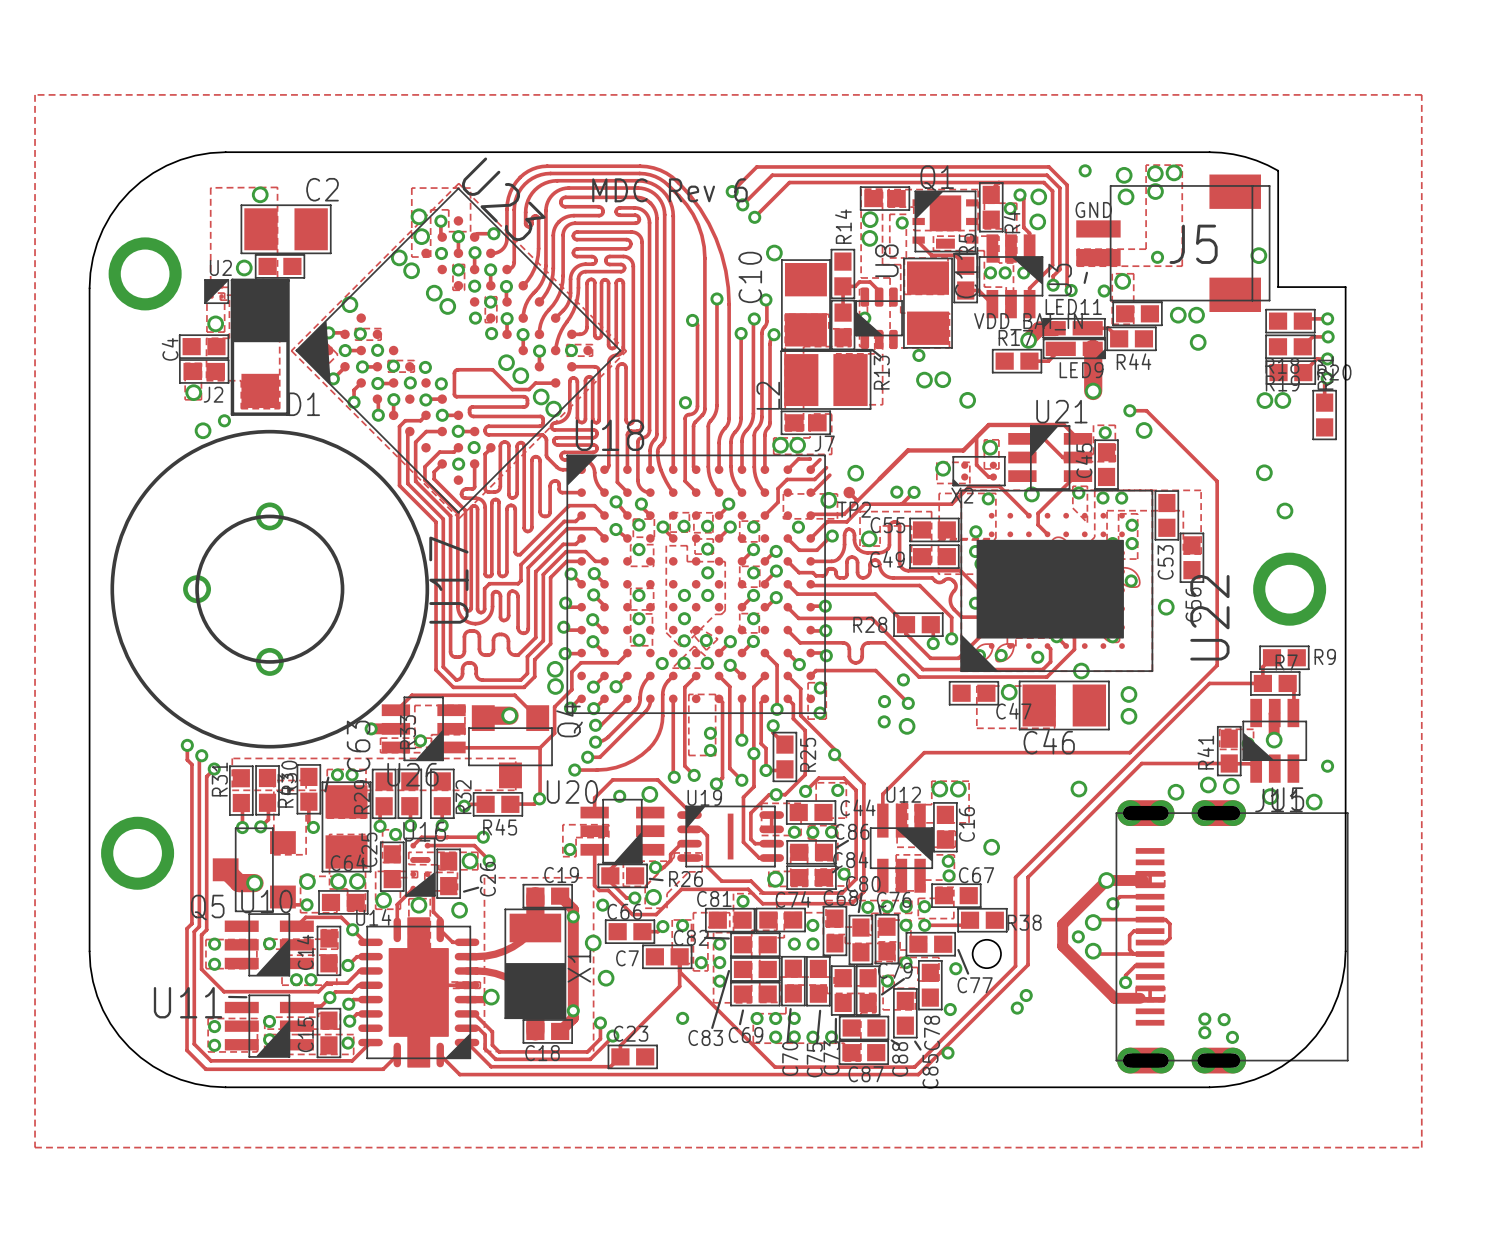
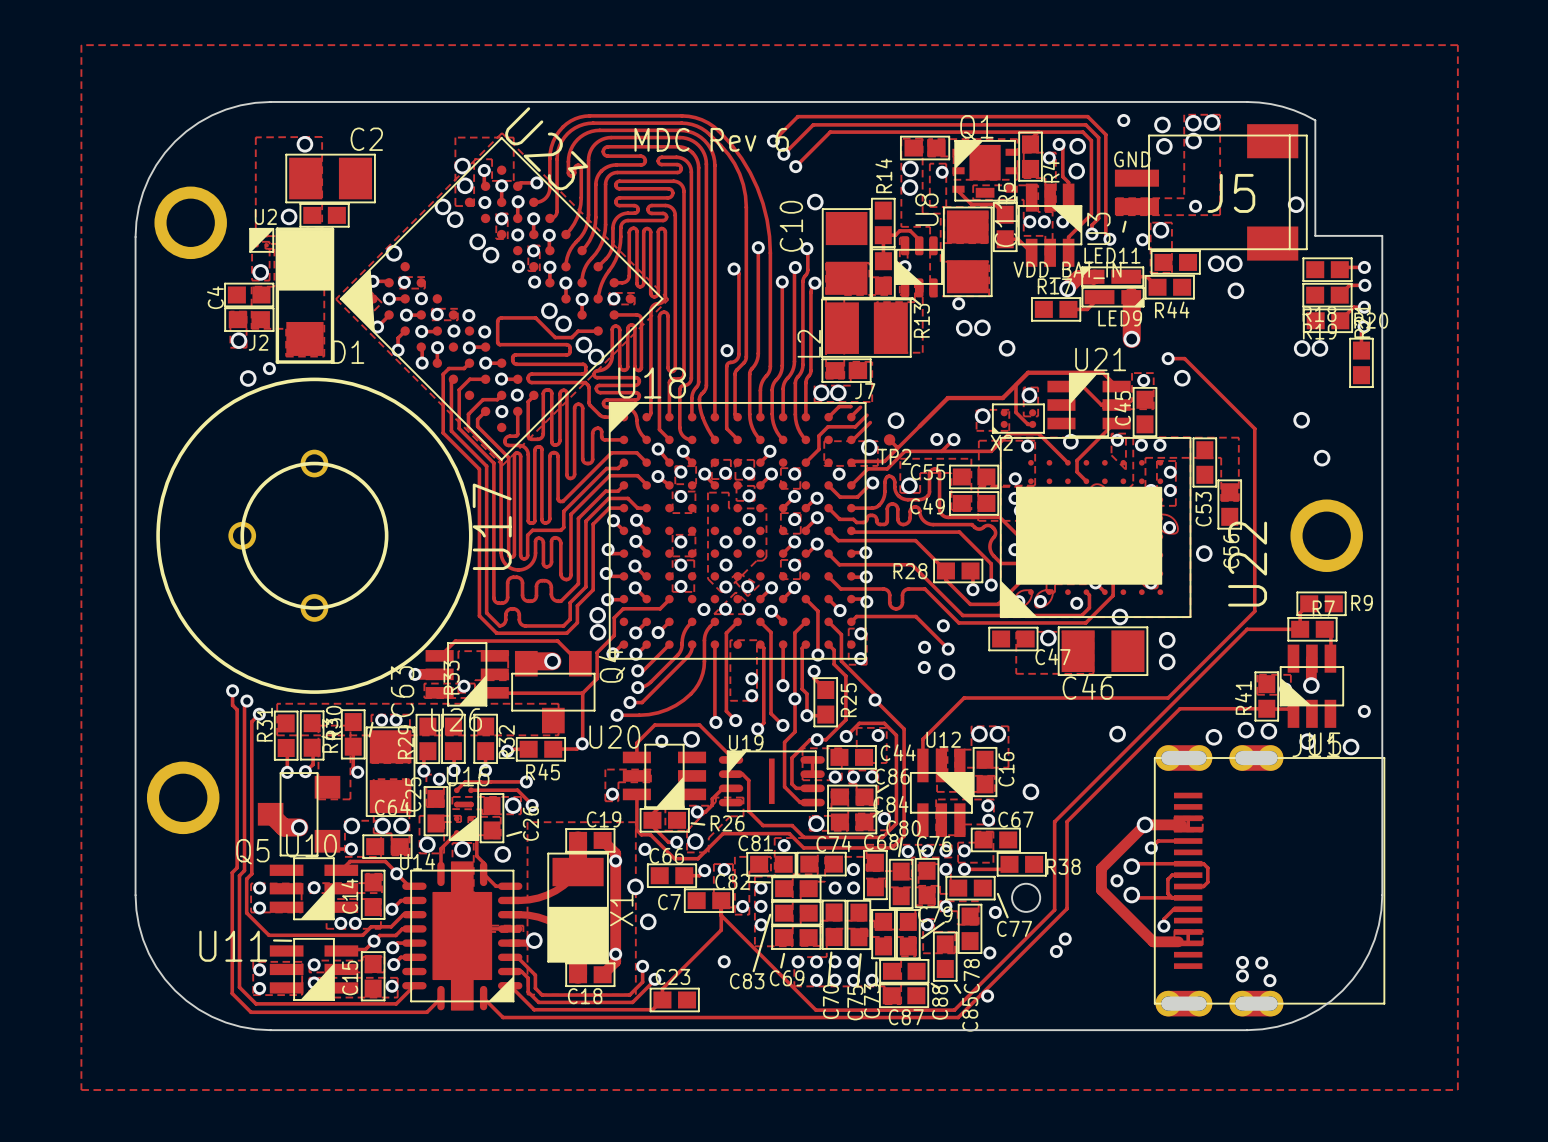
via: none -> (853, 961)

